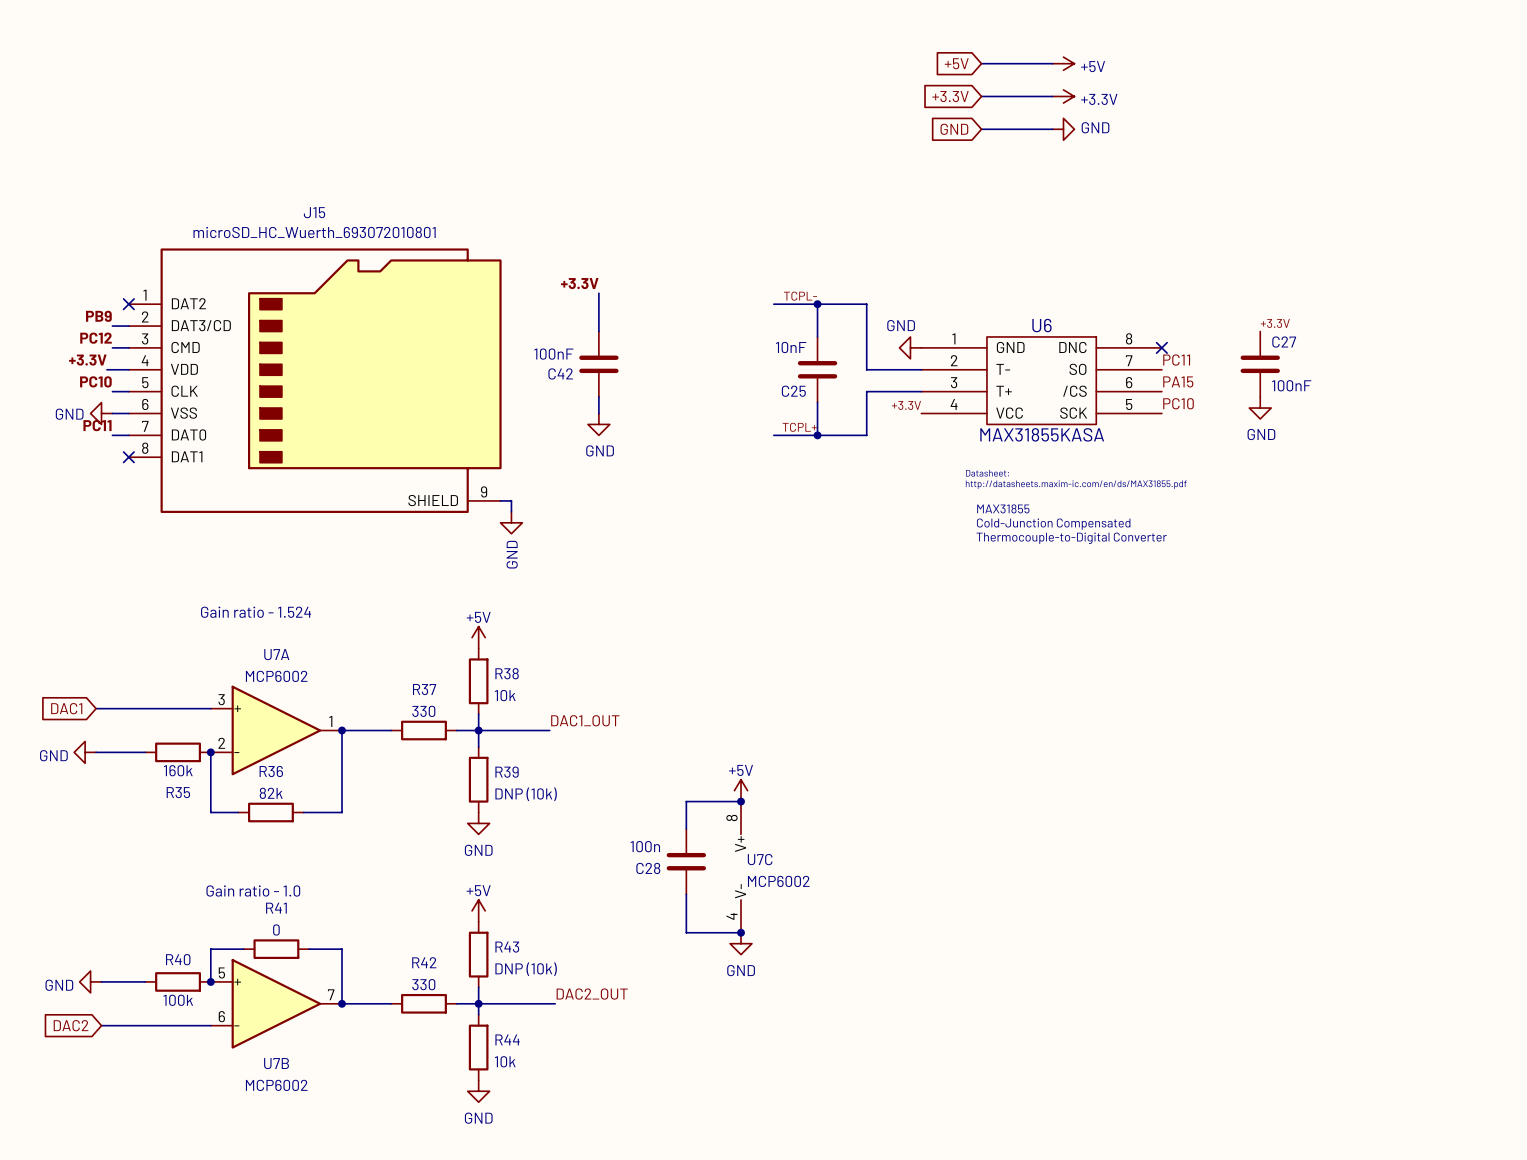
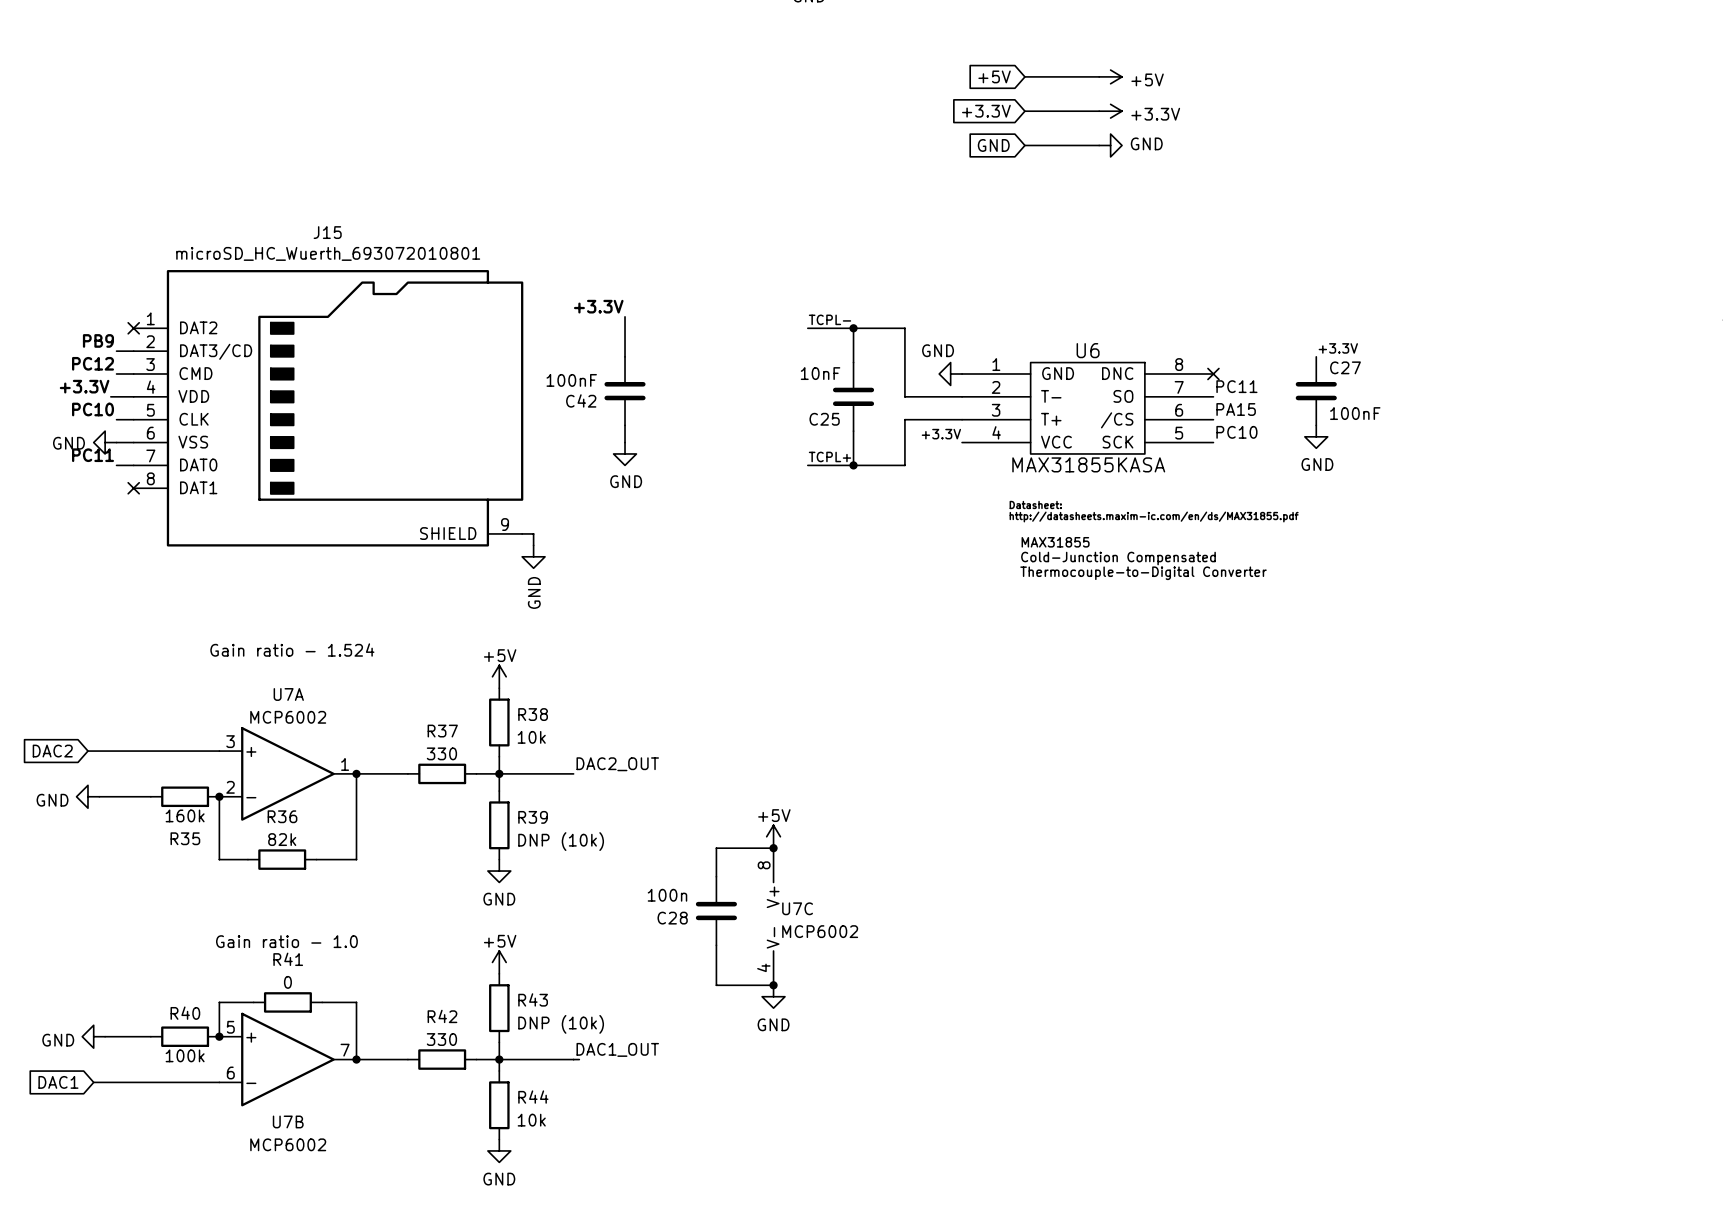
global label: DAC1 (66, 708) -> DAC2 (52, 751)
wire: none -> (87, 751) (99, 751)
label: DAC1_OUT (585, 720) -> DAC2_OUT (617, 764)
label: DAC2_OUT (592, 994) -> DAC1_OUT (617, 1049)
global label: DAC2 (71, 1025) -> DAC1 (58, 1082)
wire: none -> (93, 1082) (105, 1082)

